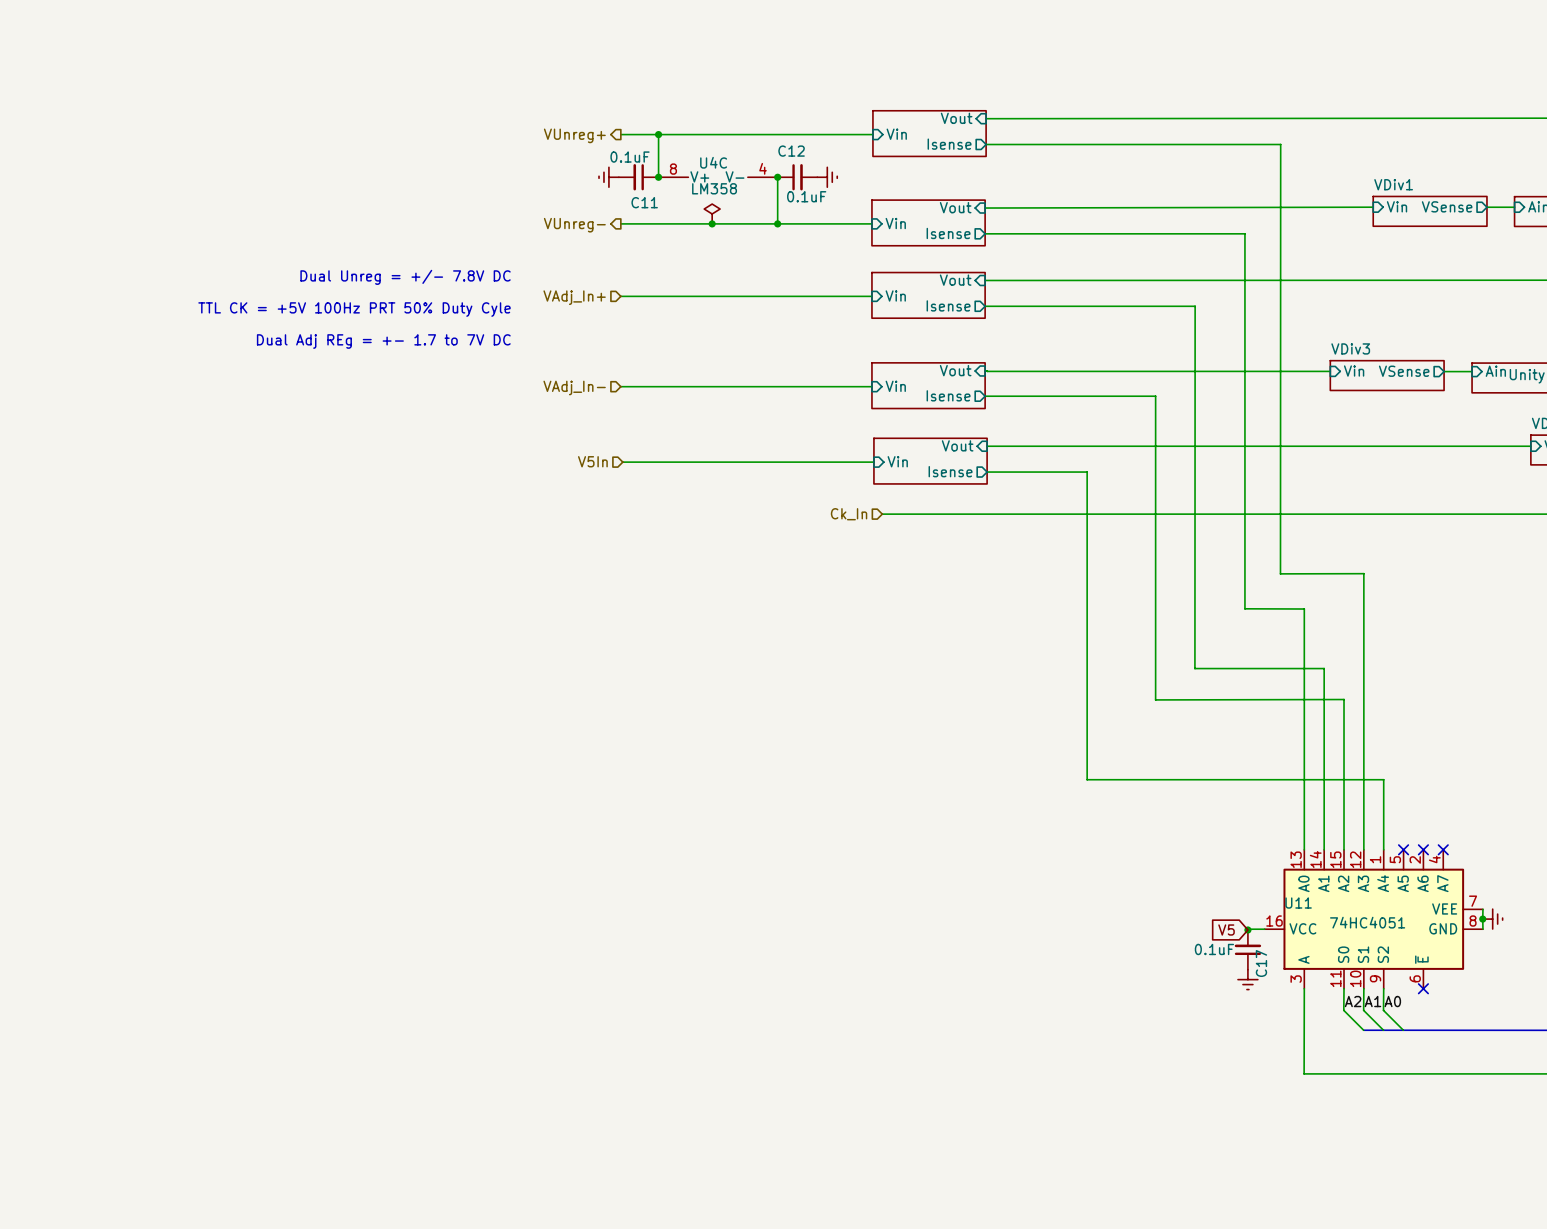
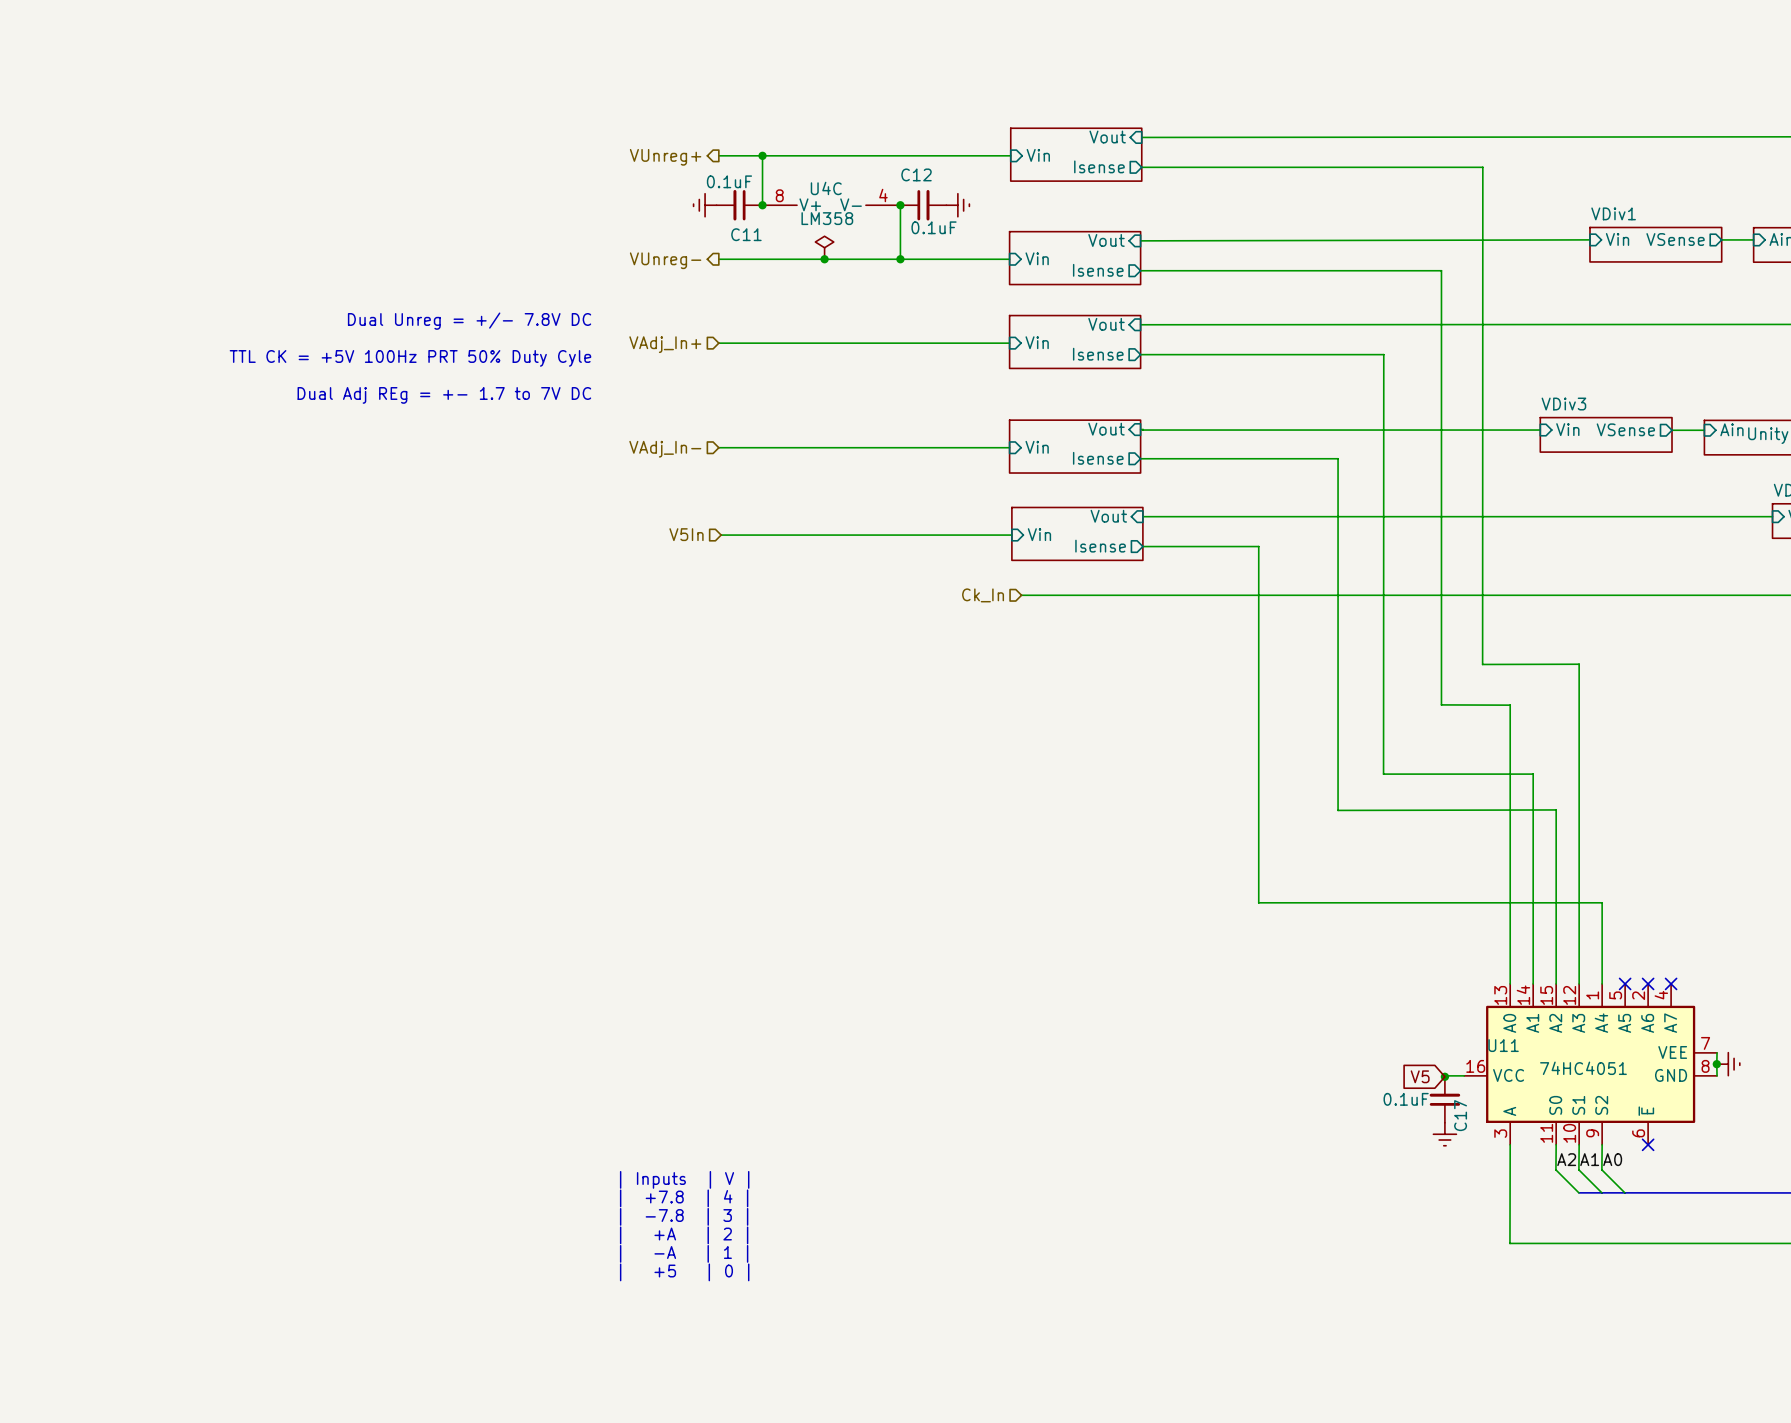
text: none -> | Inputs | V | (684, 1179)
text: none -> | +7.8 | 4 | (684, 1198)
text: none -> | -7.8 | 3 | (684, 1216)
text: none -> | +A | 2 | (684, 1235)
text: none -> | -A | 1 | (684, 1253)
text: none -> | +5 | 0 | (684, 1272)

